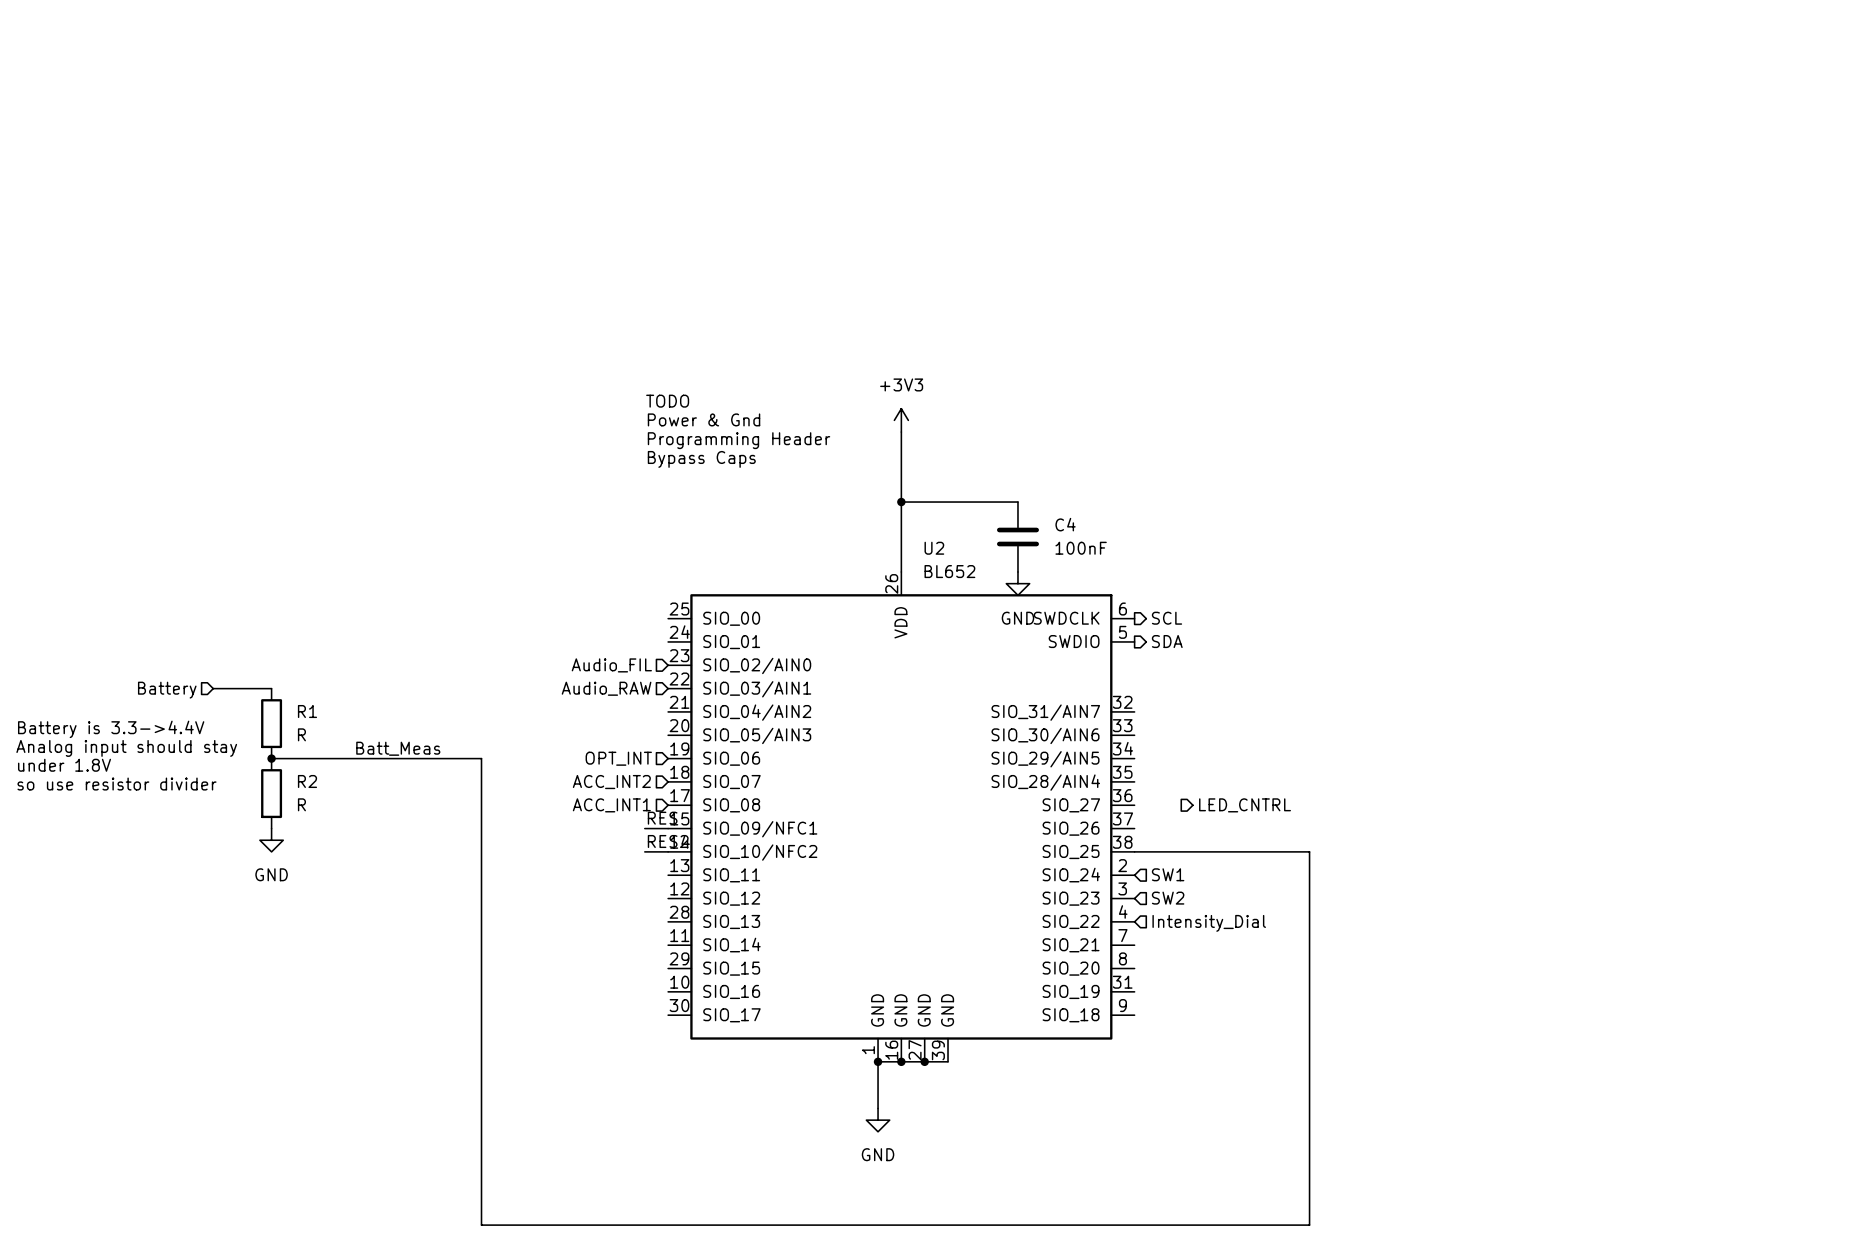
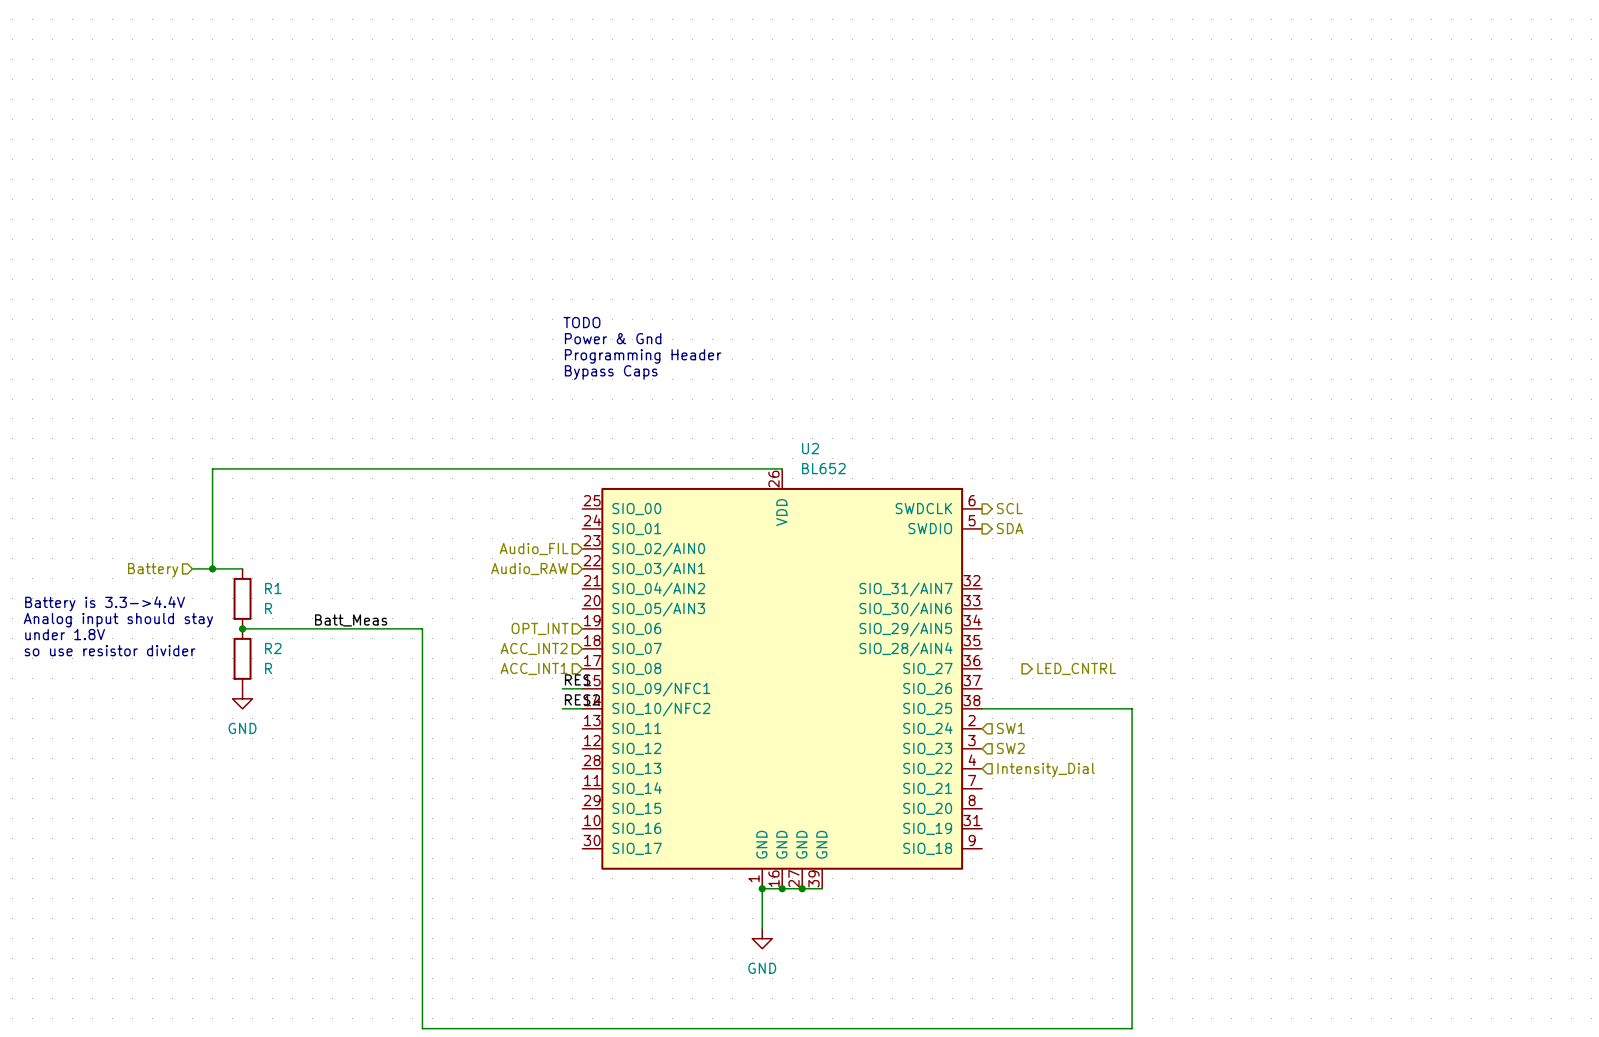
power symbol: +3V3 (901, 420) -> none
wire: (901, 432) (901, 571) -> (212, 568) (212, 468) (782, 468)
wire: (901, 502) (1017, 502) -> none
junction: (901, 502) -> none
C4: 100nF (1017, 537) -> none
power symbol: GND (1017, 583) -> none
junction: none -> (212, 568)

